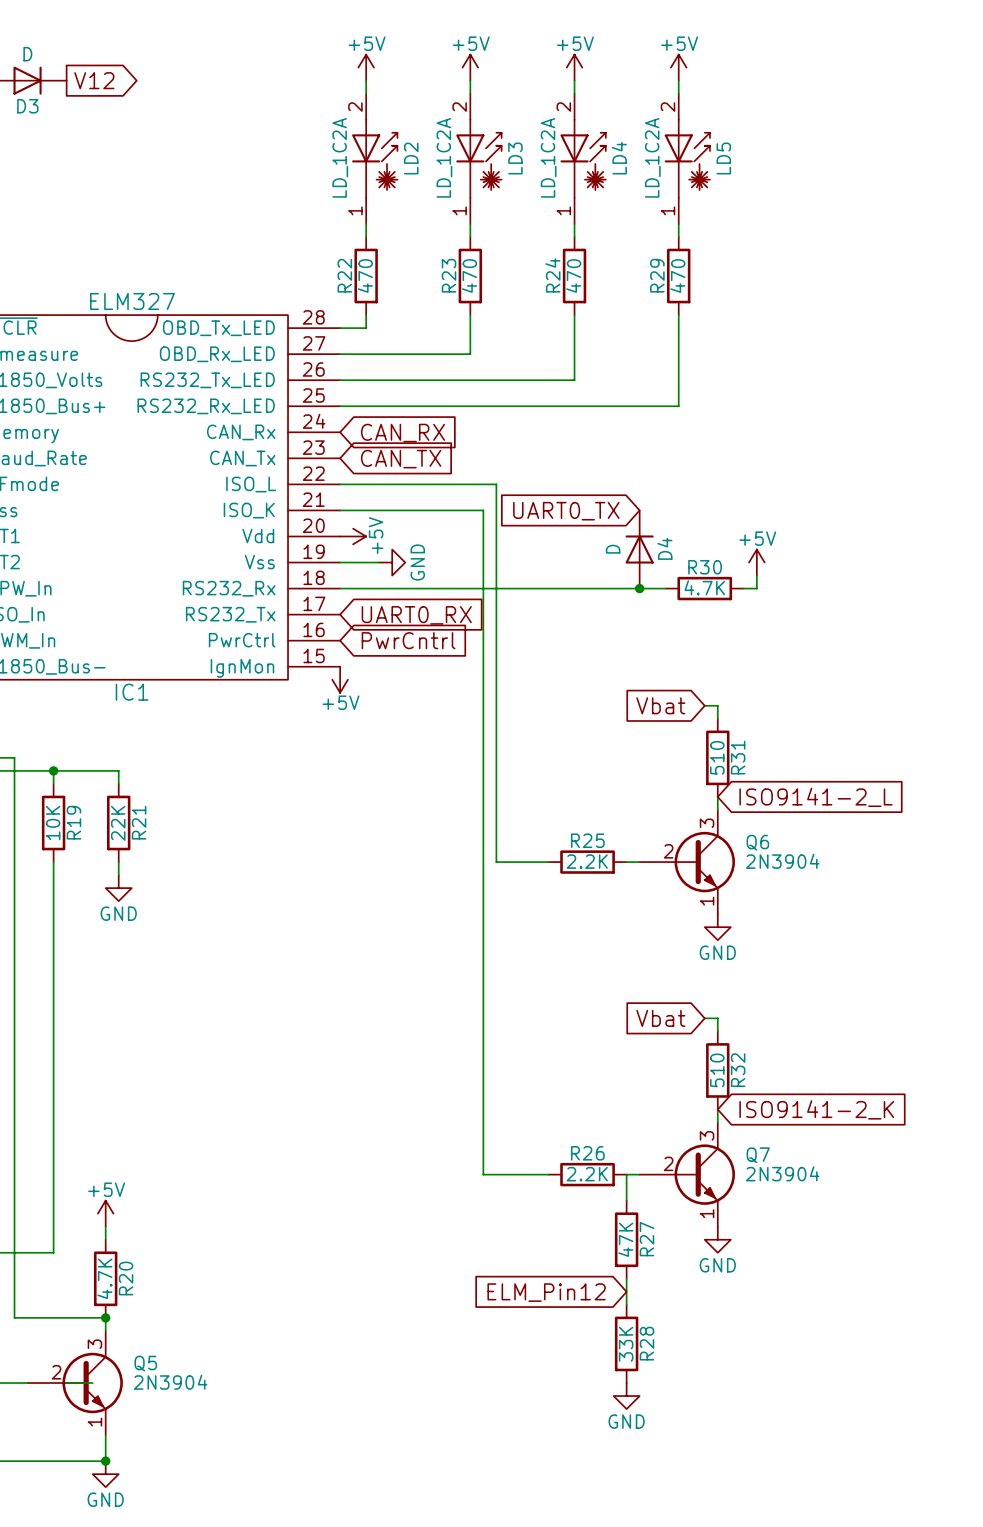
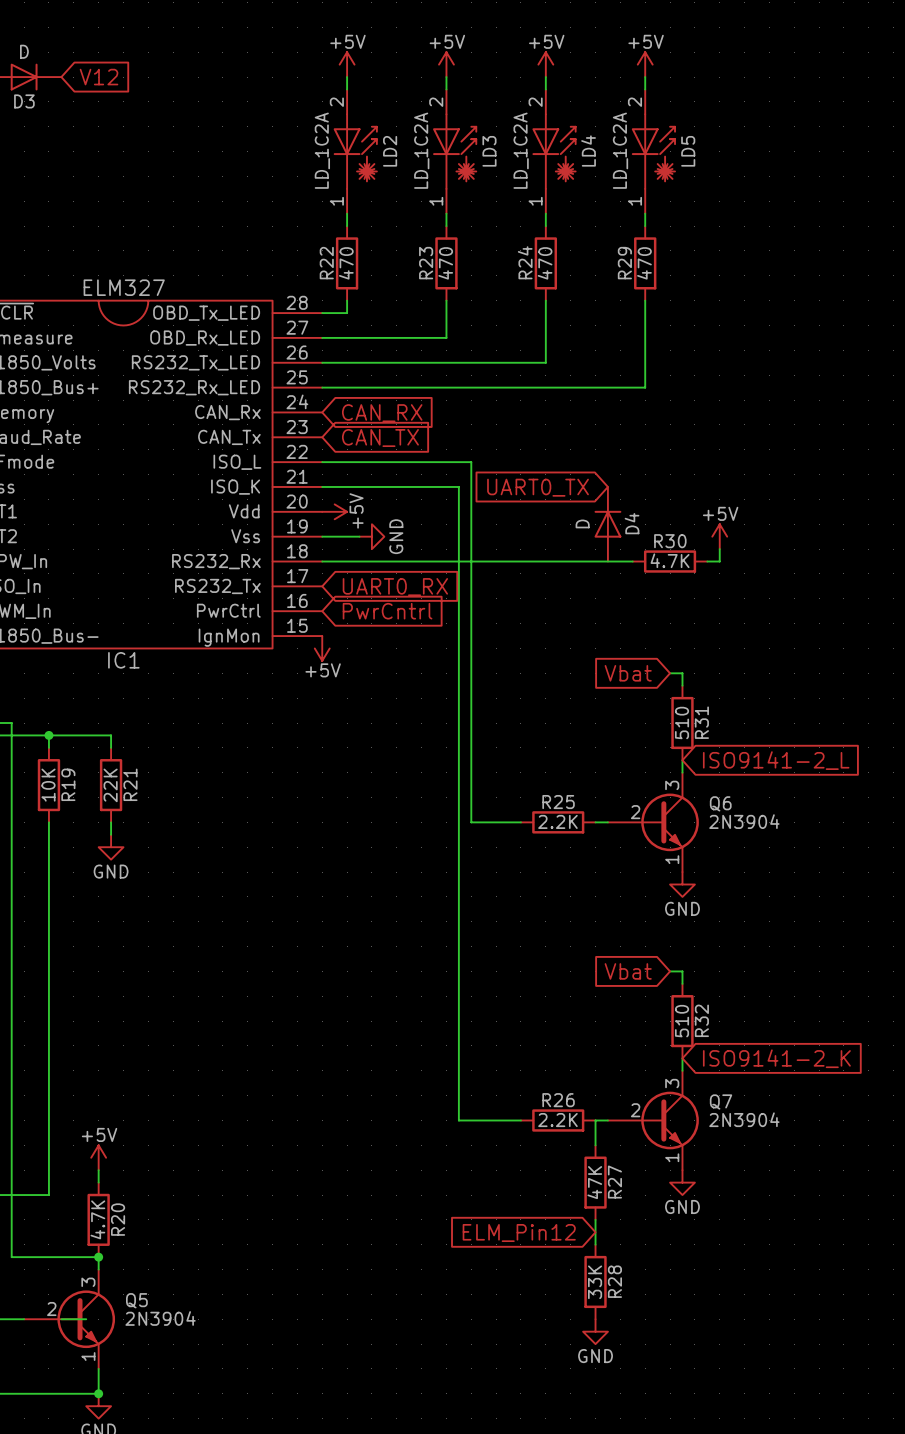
global label shape: output (94, 80) -> input (99, 77)
junction: (639, 588) -> none

